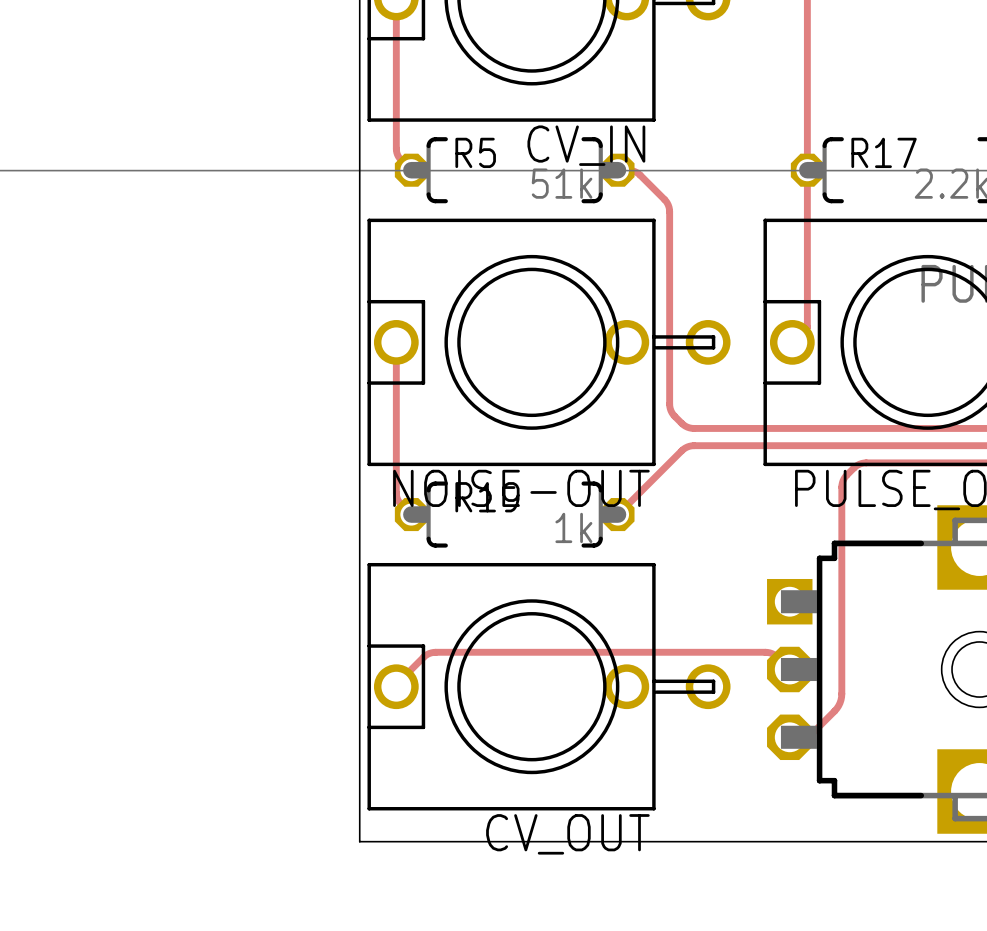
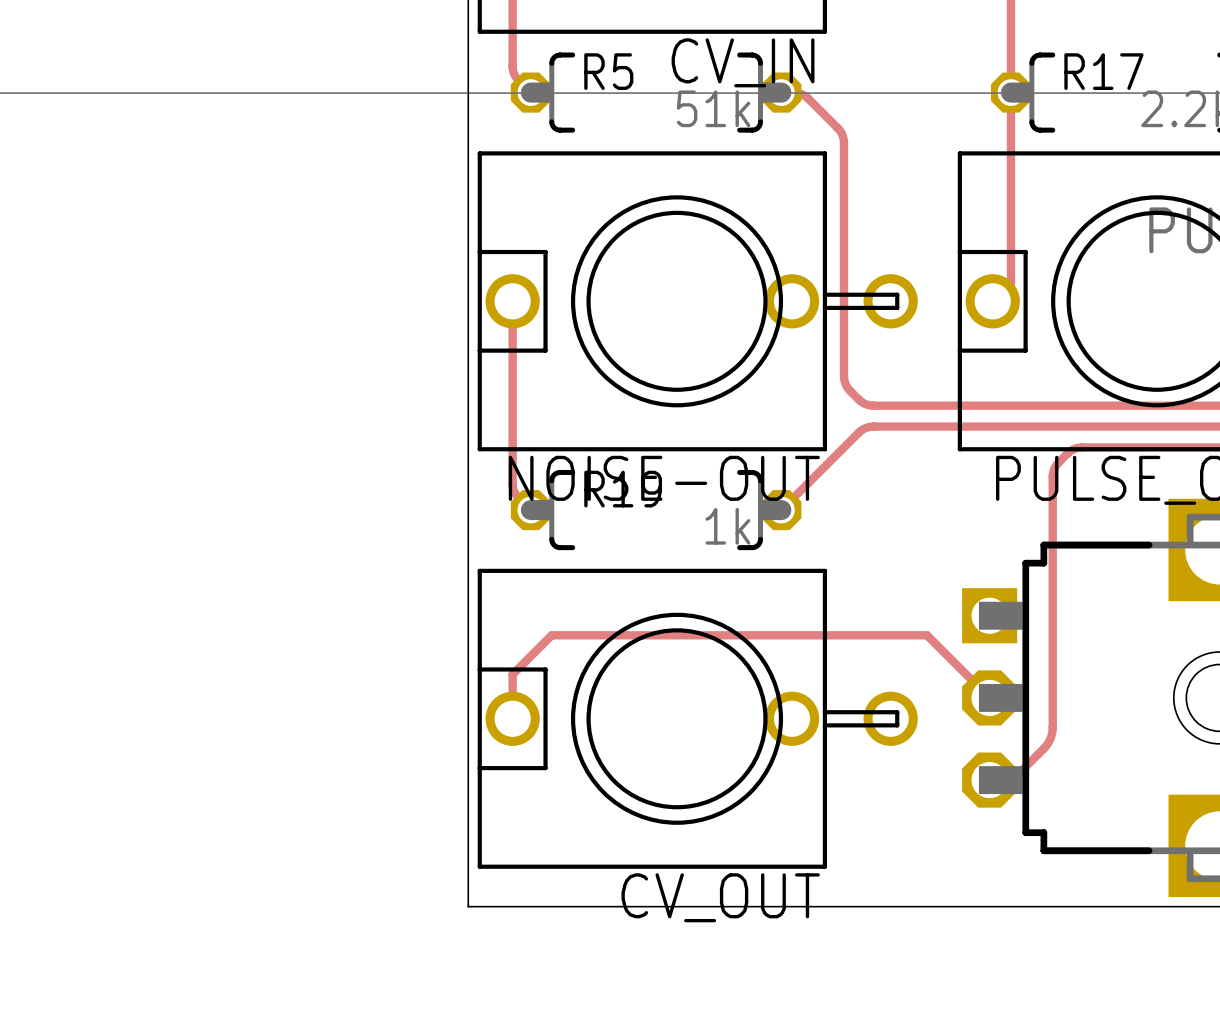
track: (777, 657) (765, 652) (433, 652) (425, 655) (396, 684) -> (974, 683) (927, 635) (551, 635) (512, 674) (512, 716)

